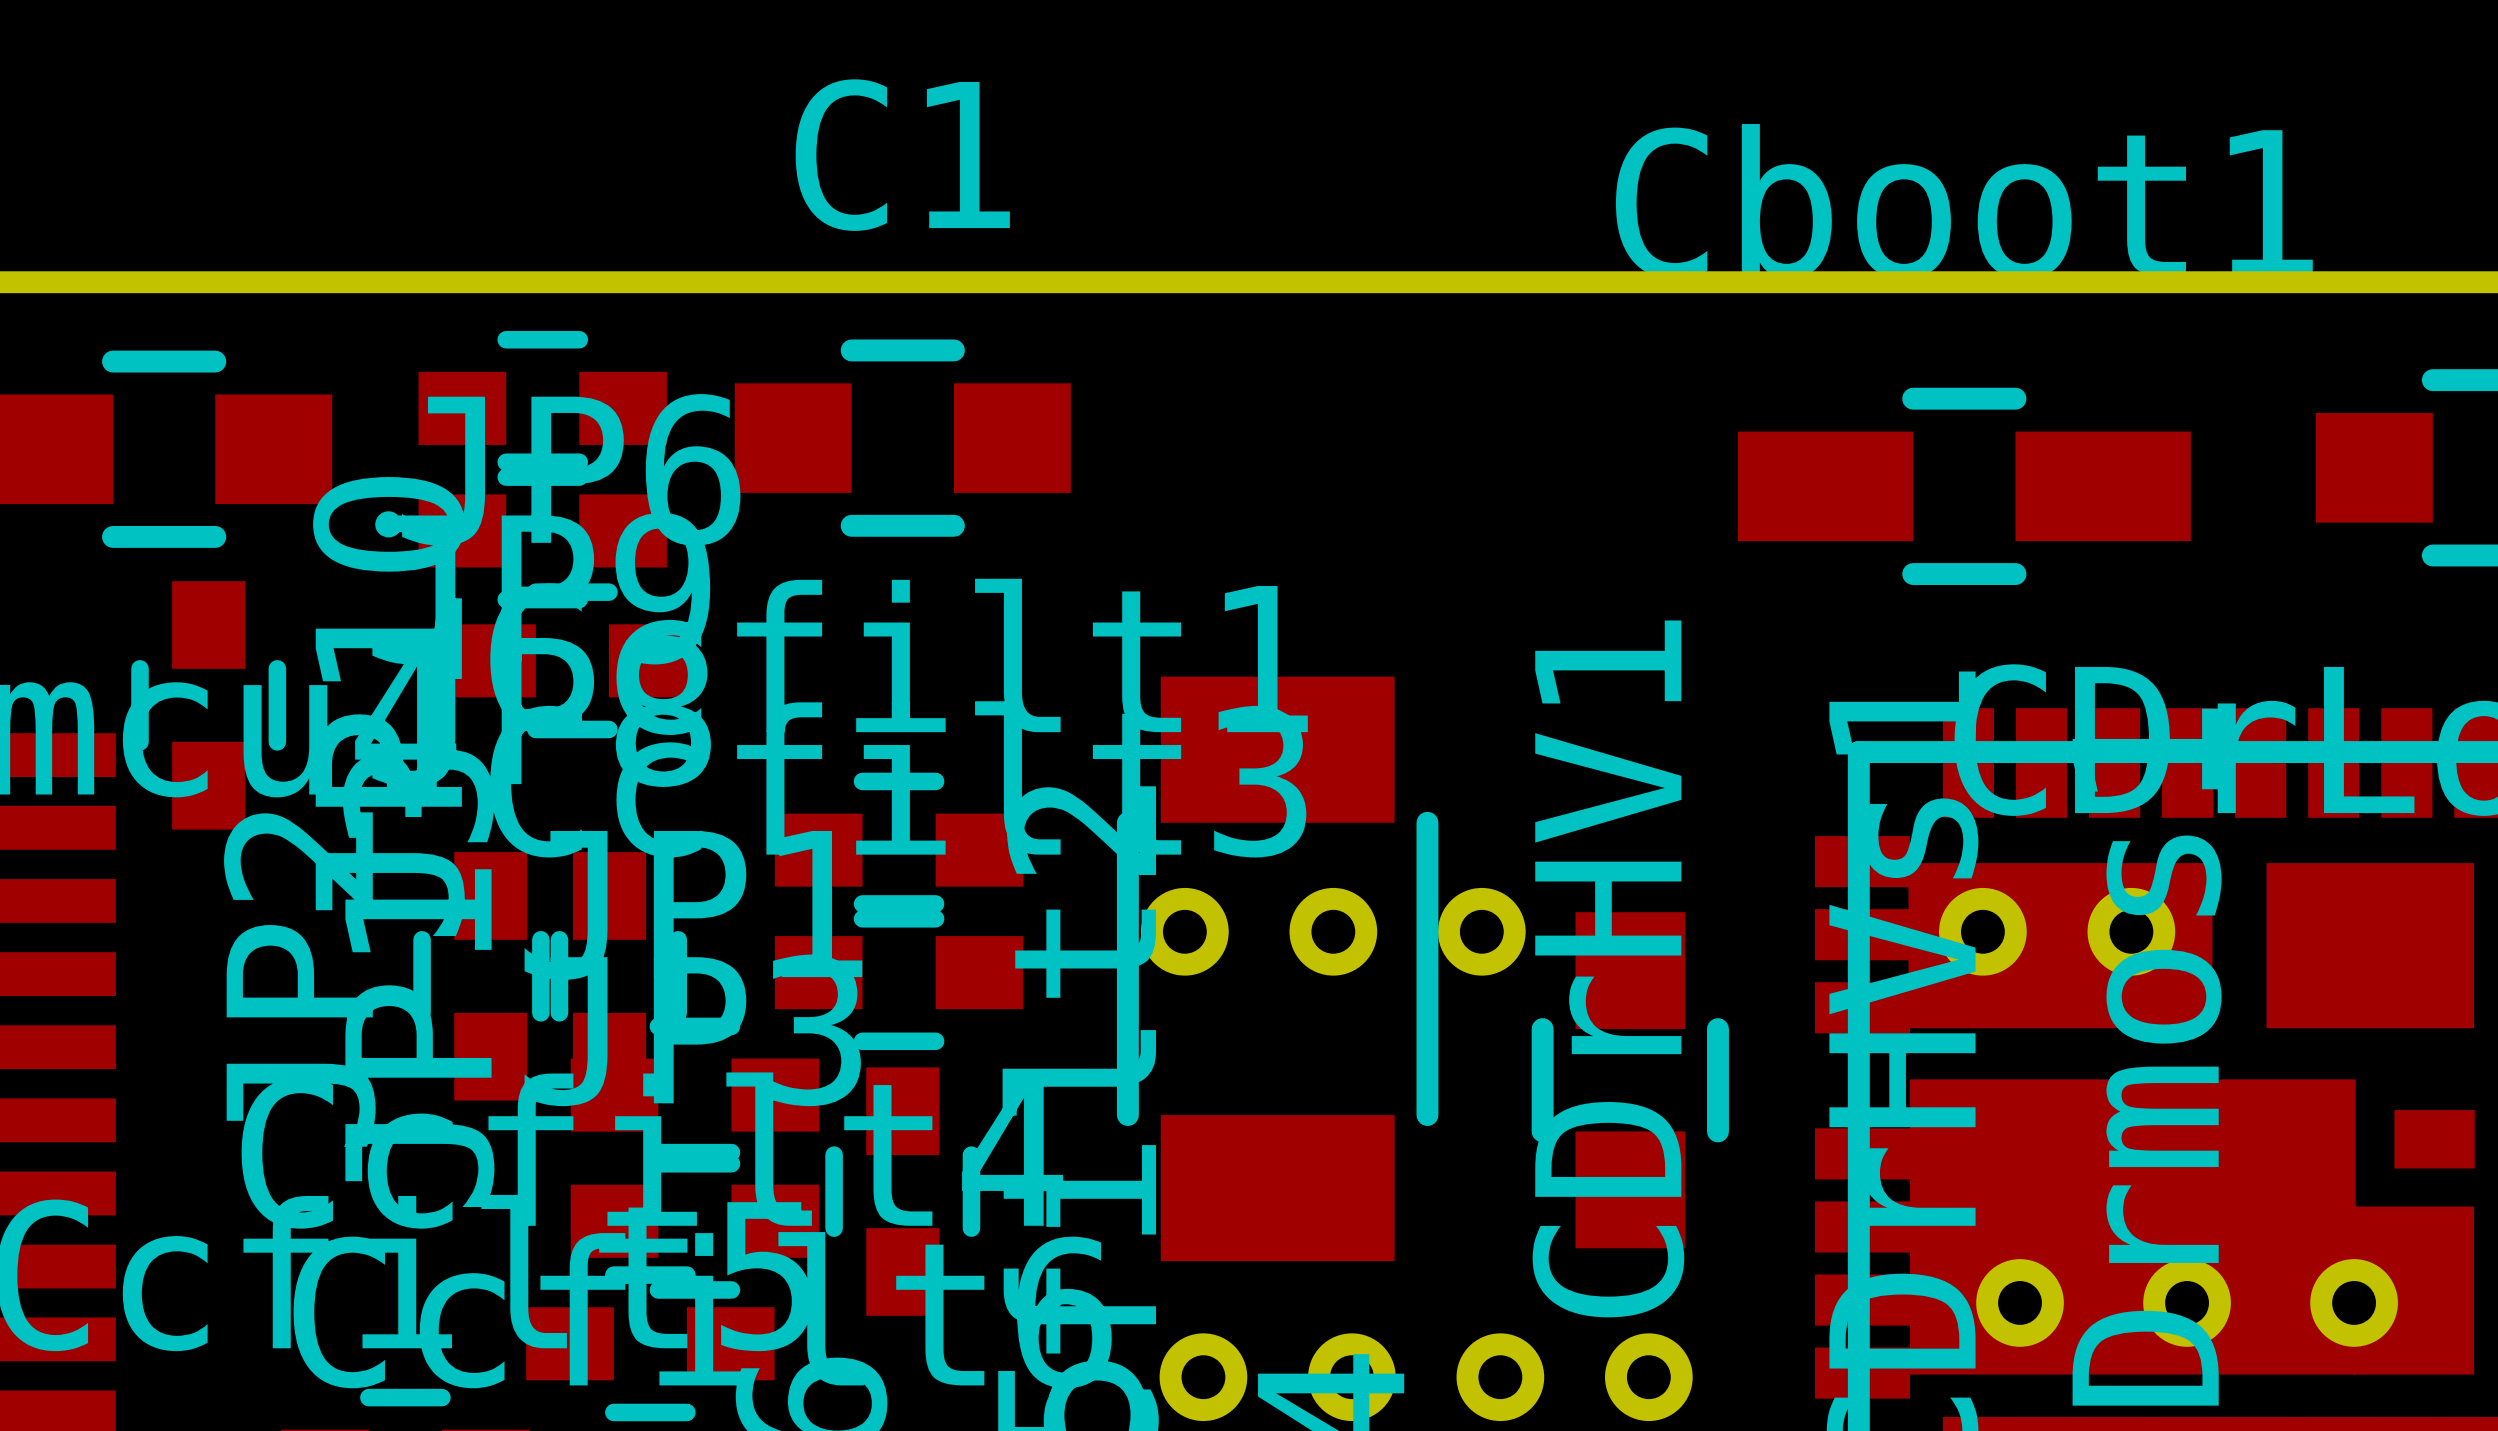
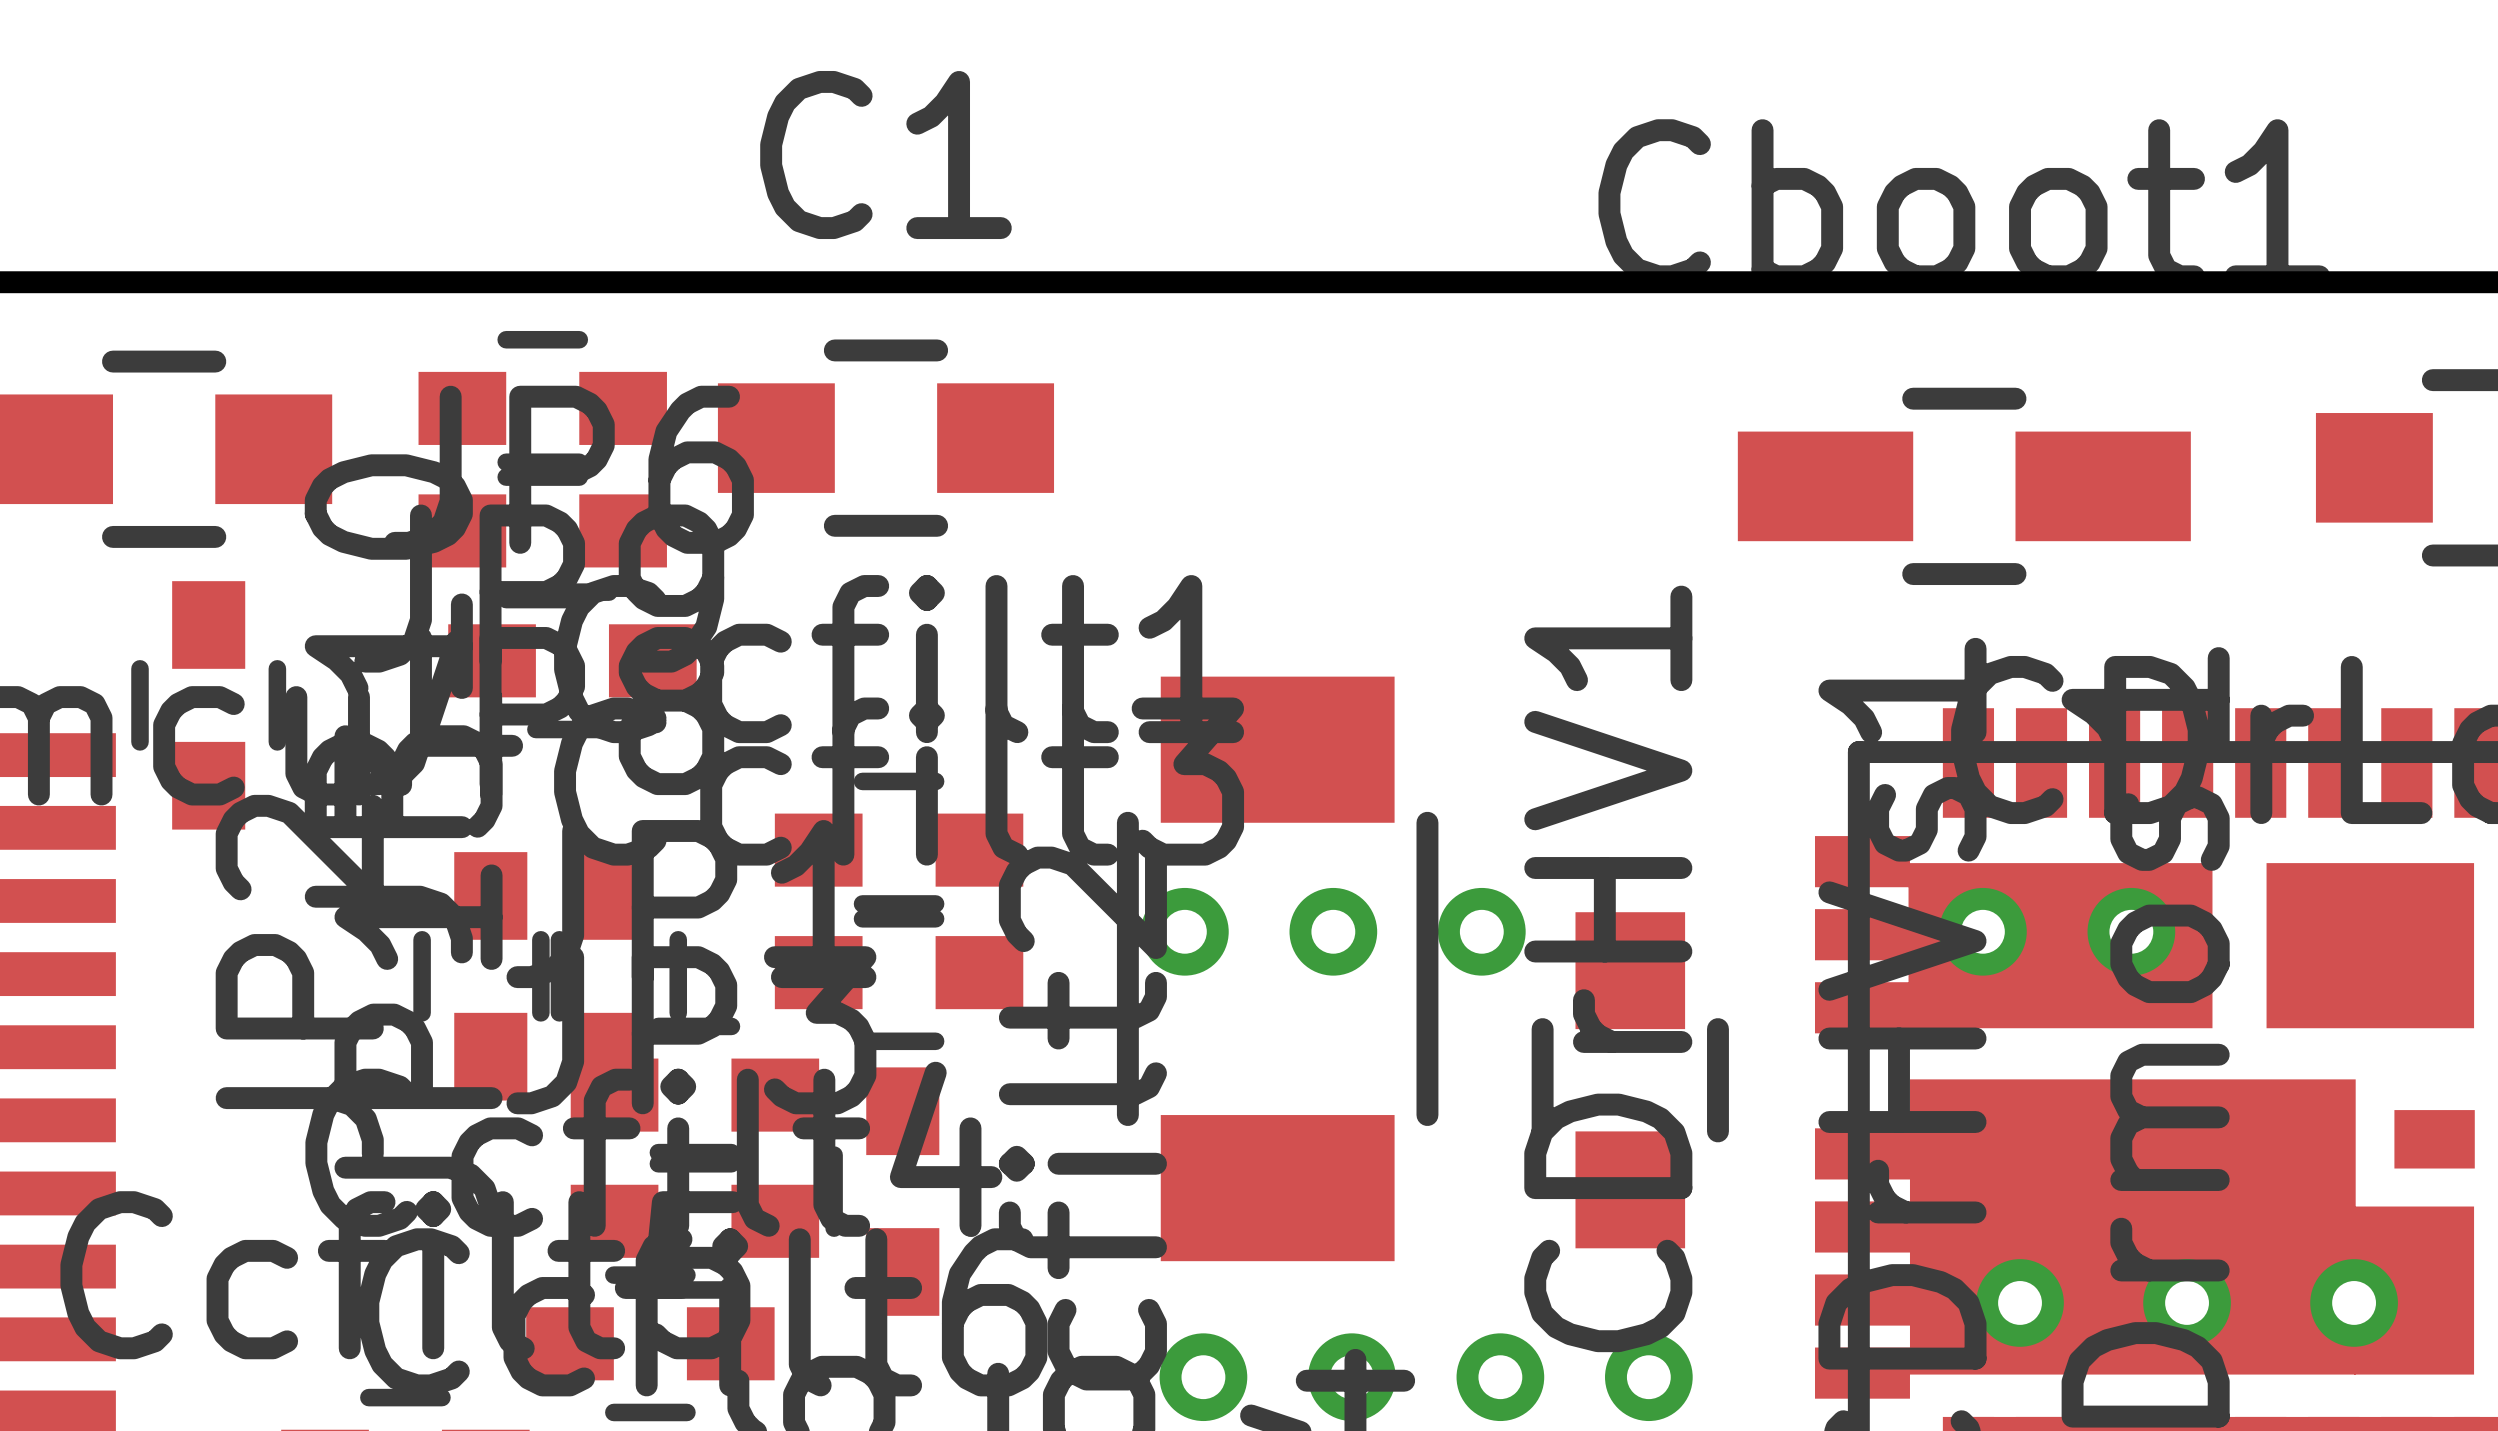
C1 position: (902, 438) -> (885, 438)

